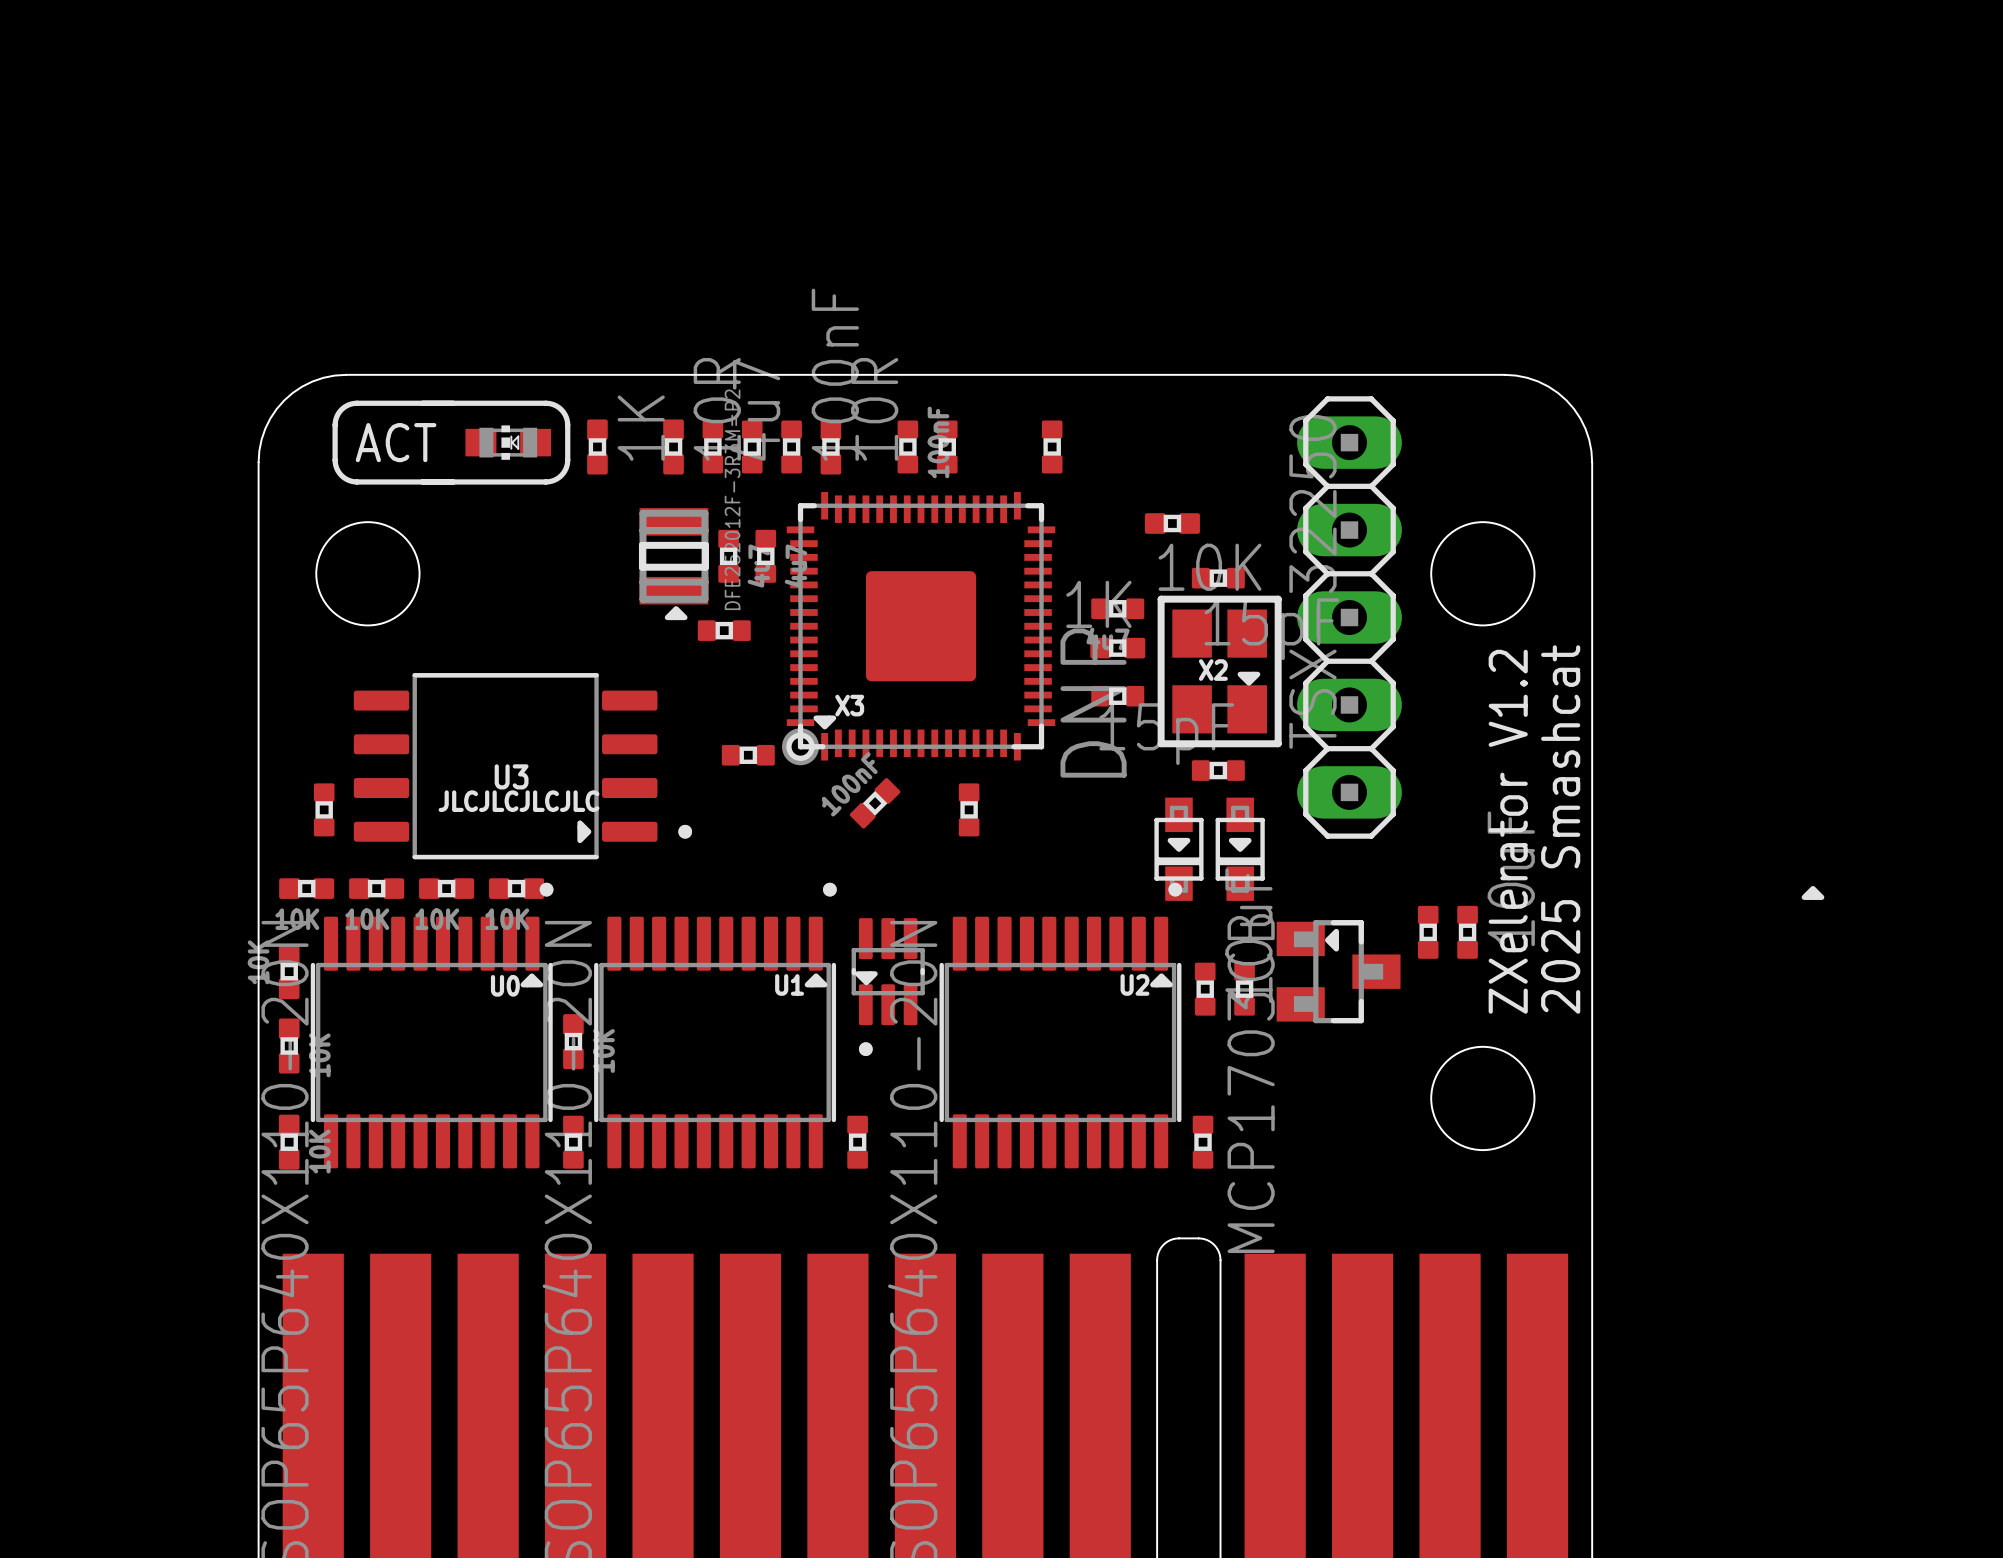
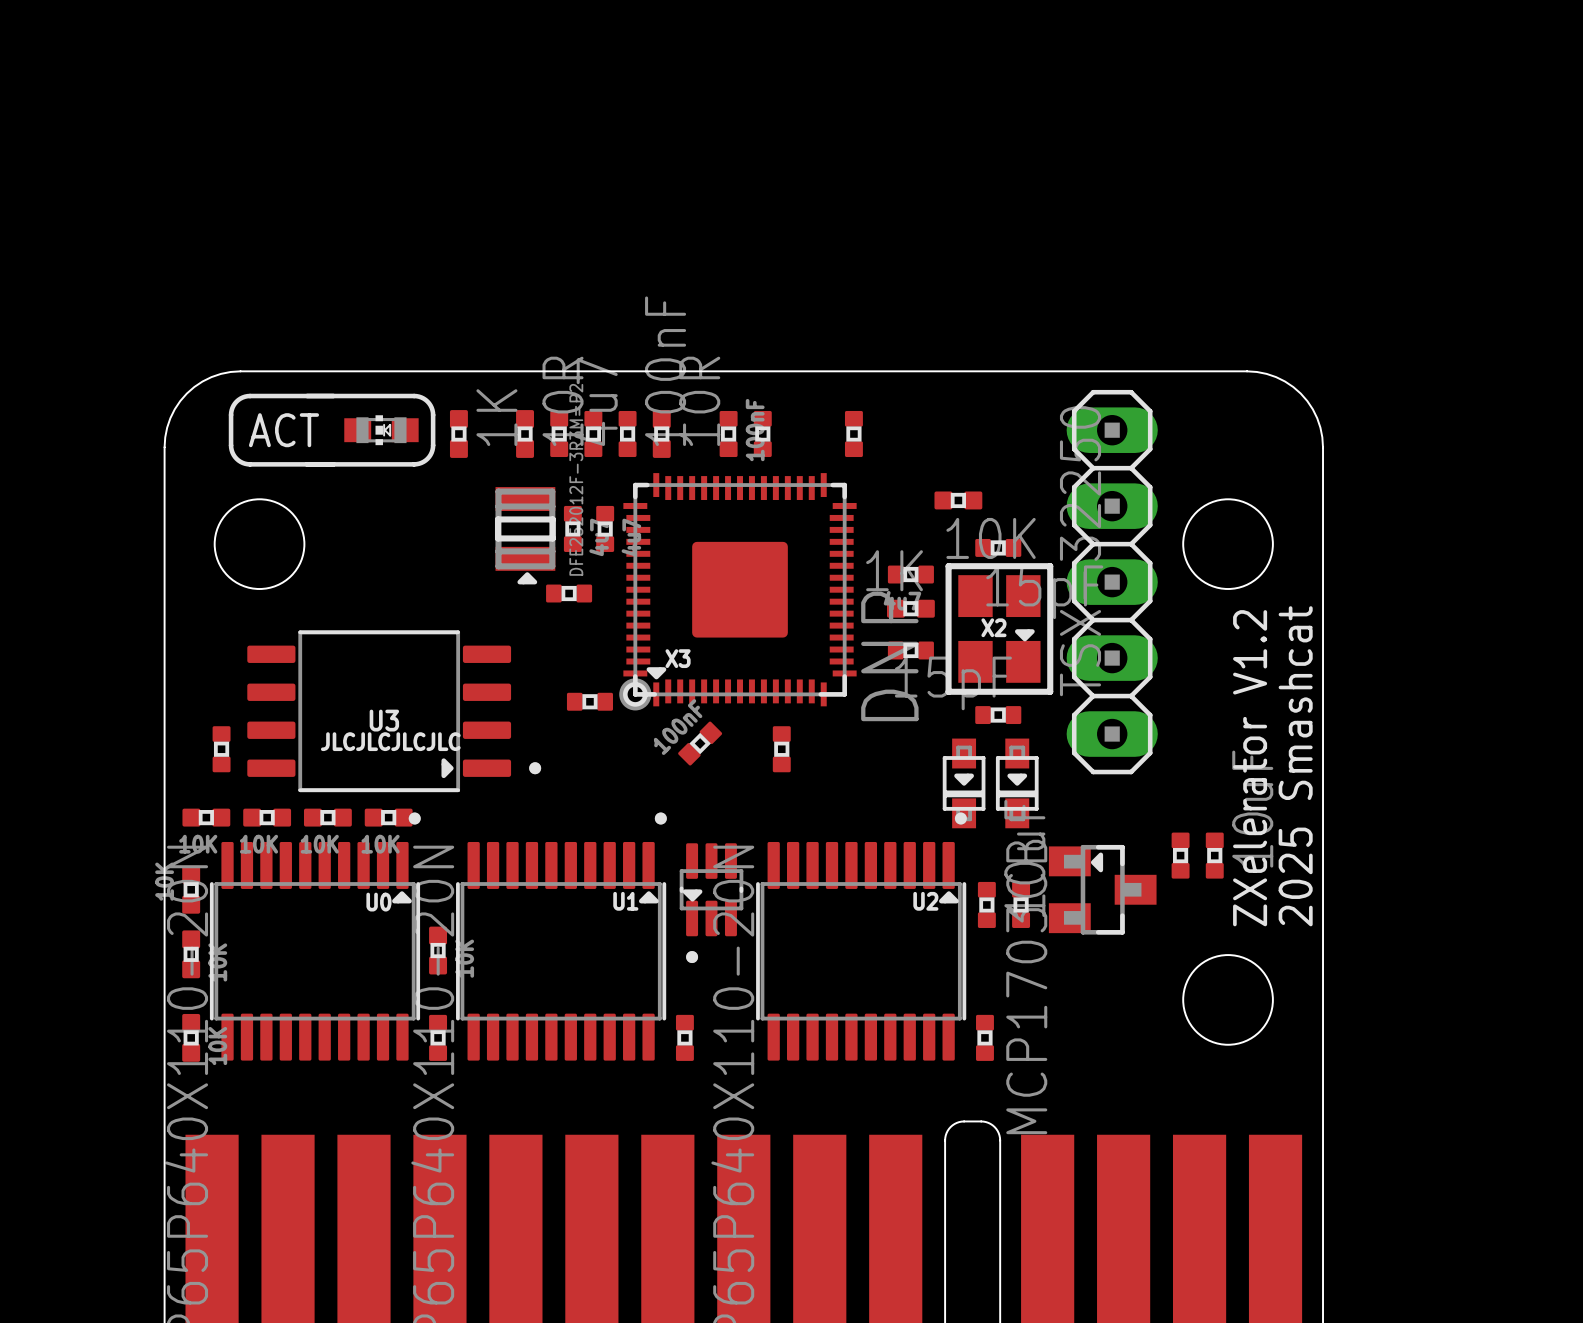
drawing: [1801, 885, 1825, 900] -> none

